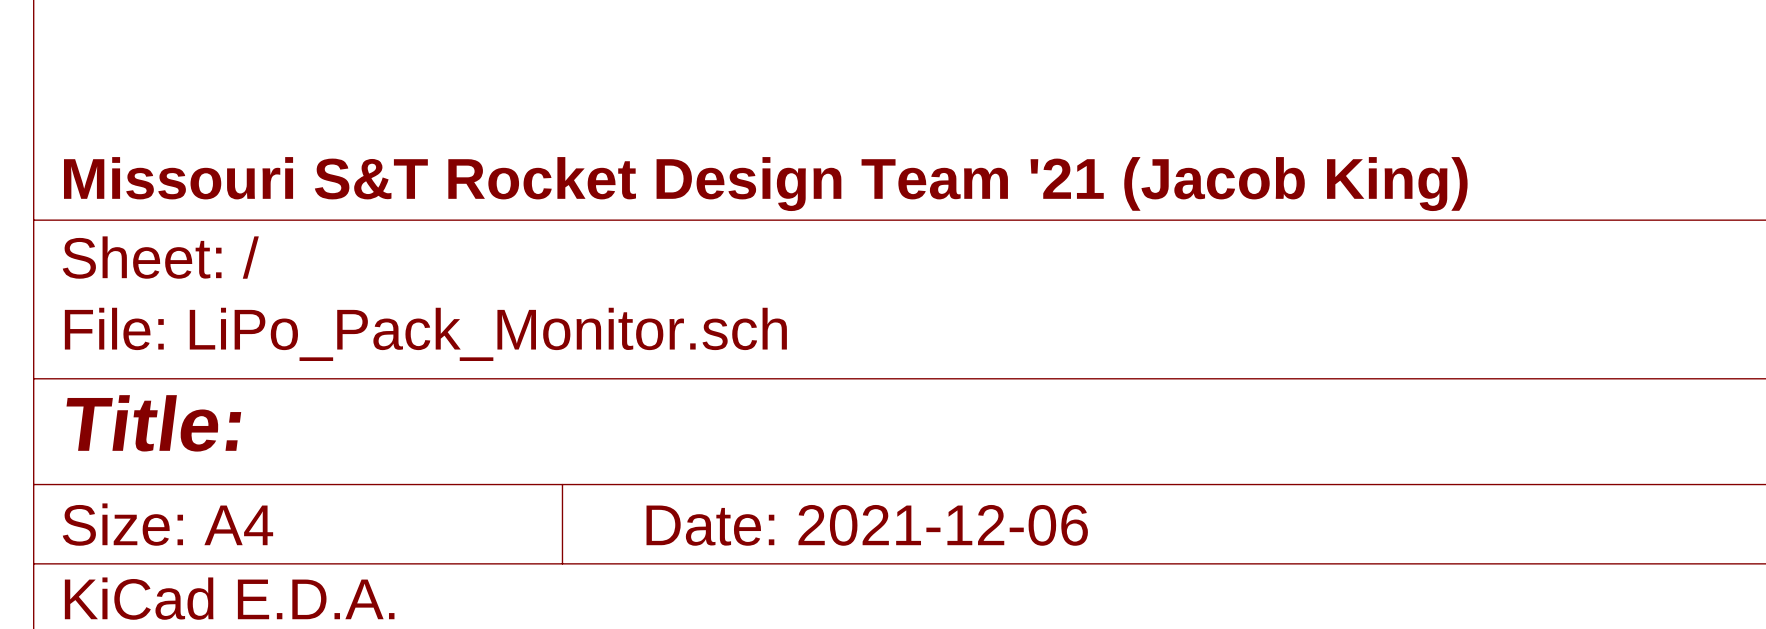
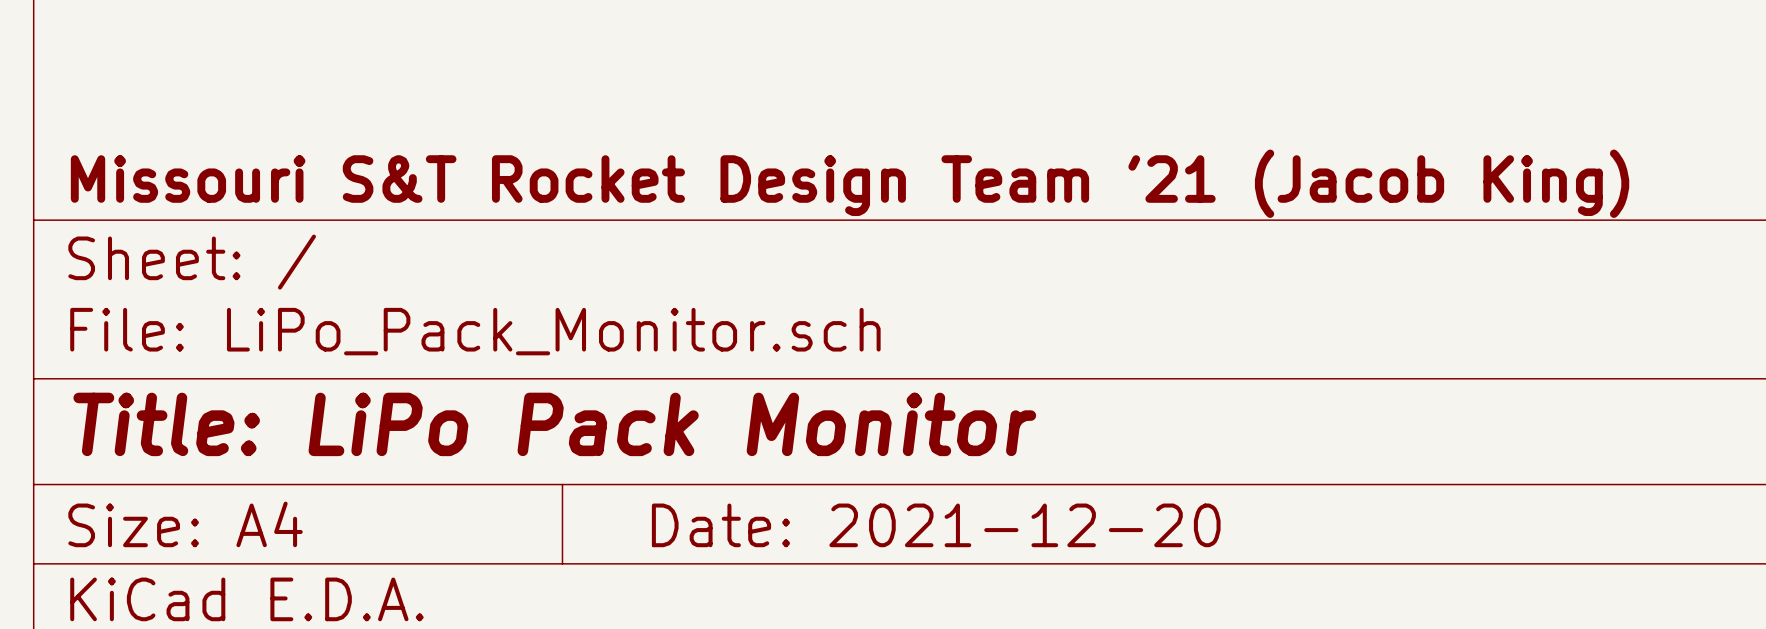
title block: Title: (153, 423) -> Title: LiPo Pack Monitor (554, 424)
title block: Date: 2021-12-06 (867, 525) -> Date: 2021-12-20 (936, 525)

